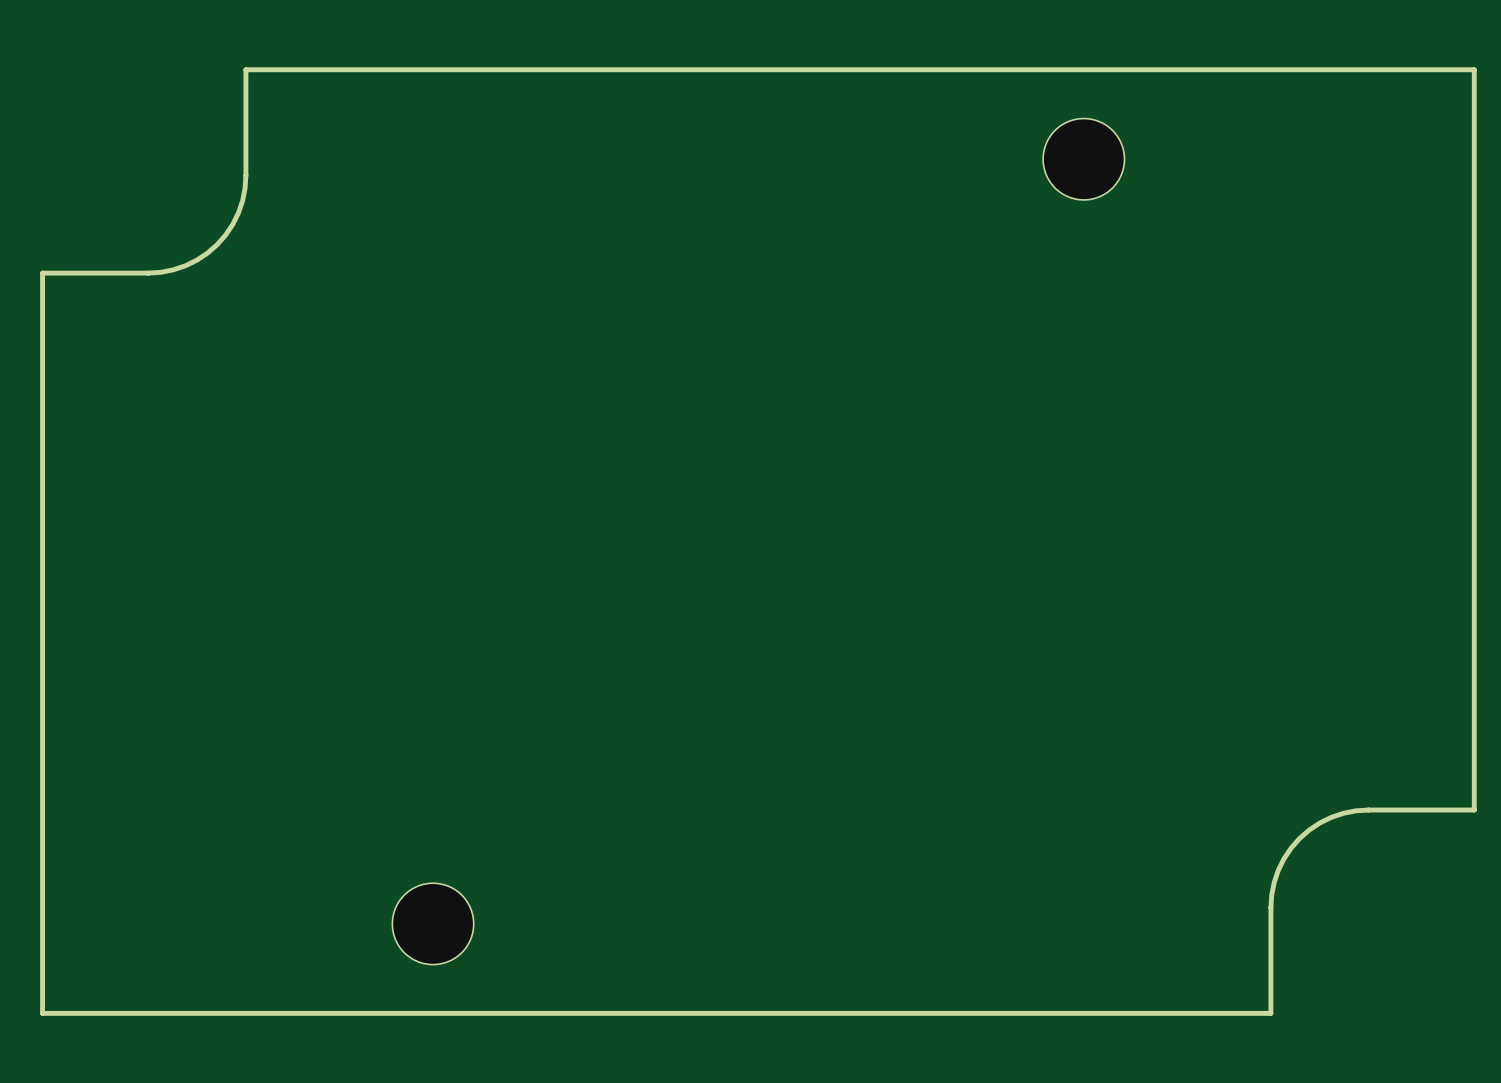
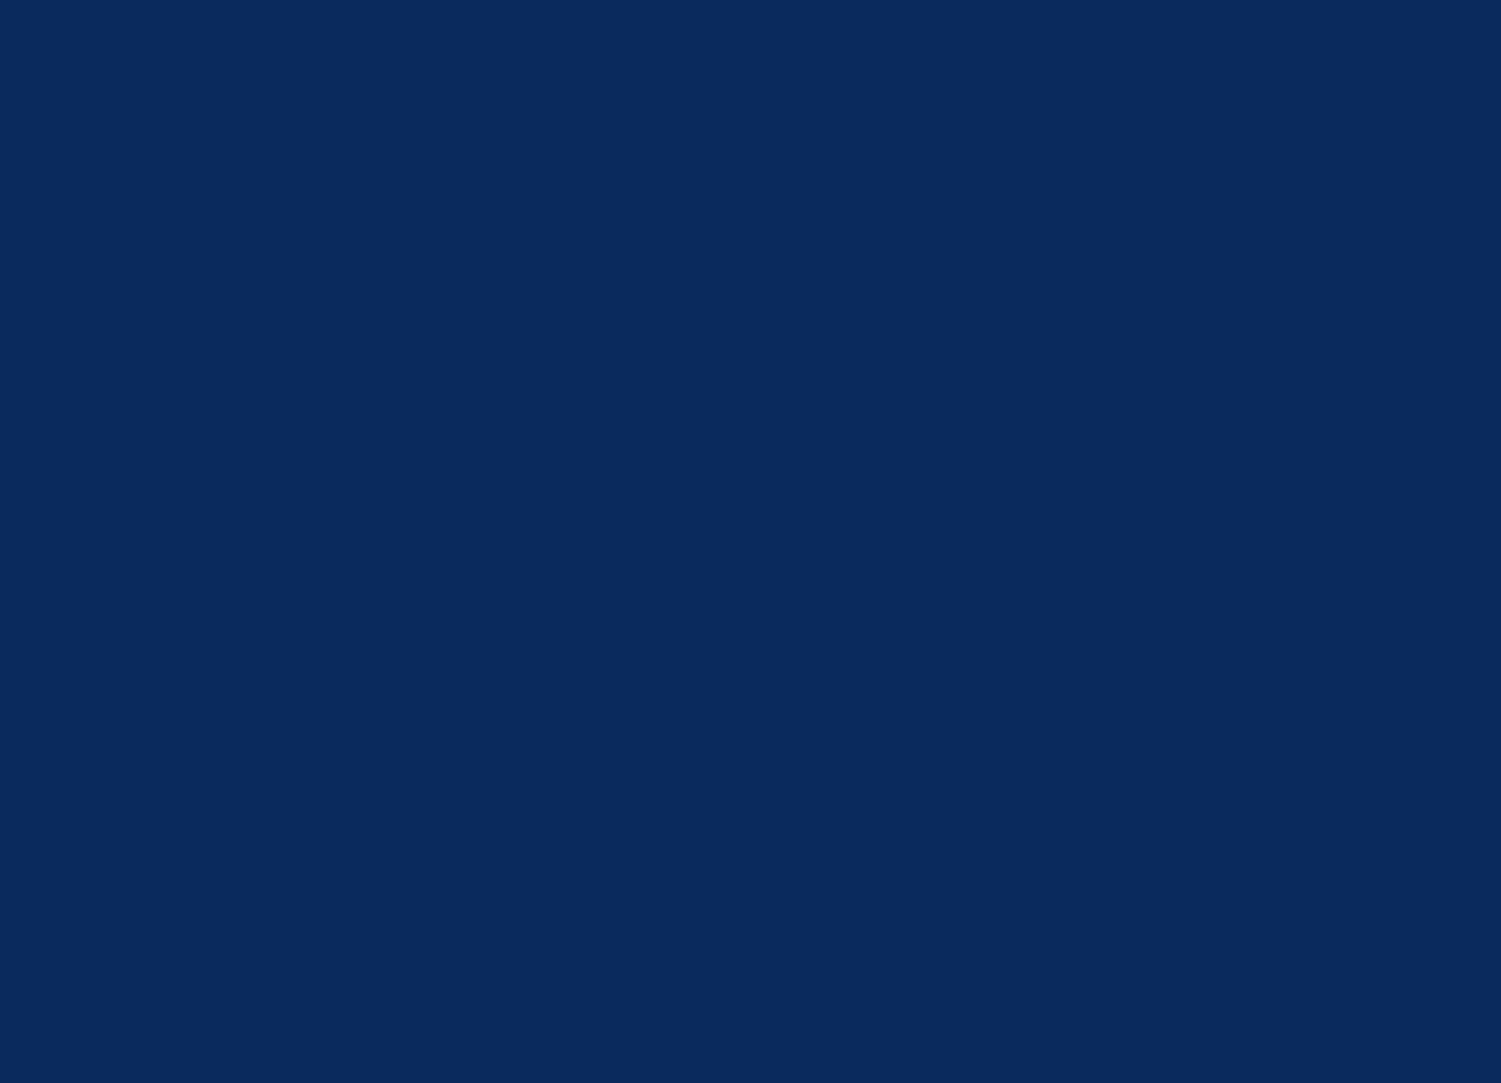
board edge: (1474, 69) (1474, 810) (1355, 810) (1331, 817) (1309, 830) (1299, 838) (1291, 848) (1278, 870) (1271, 894) (1270, 1013) (42, 1013) (42, 273) (161, 272) (185, 265) (207, 252) (217, 244) (225, 234) (238, 212) (245, 188) (245, 69) (1474, 69) -> none
part: (1083, 159) -> none
part: (433, 923) -> none

